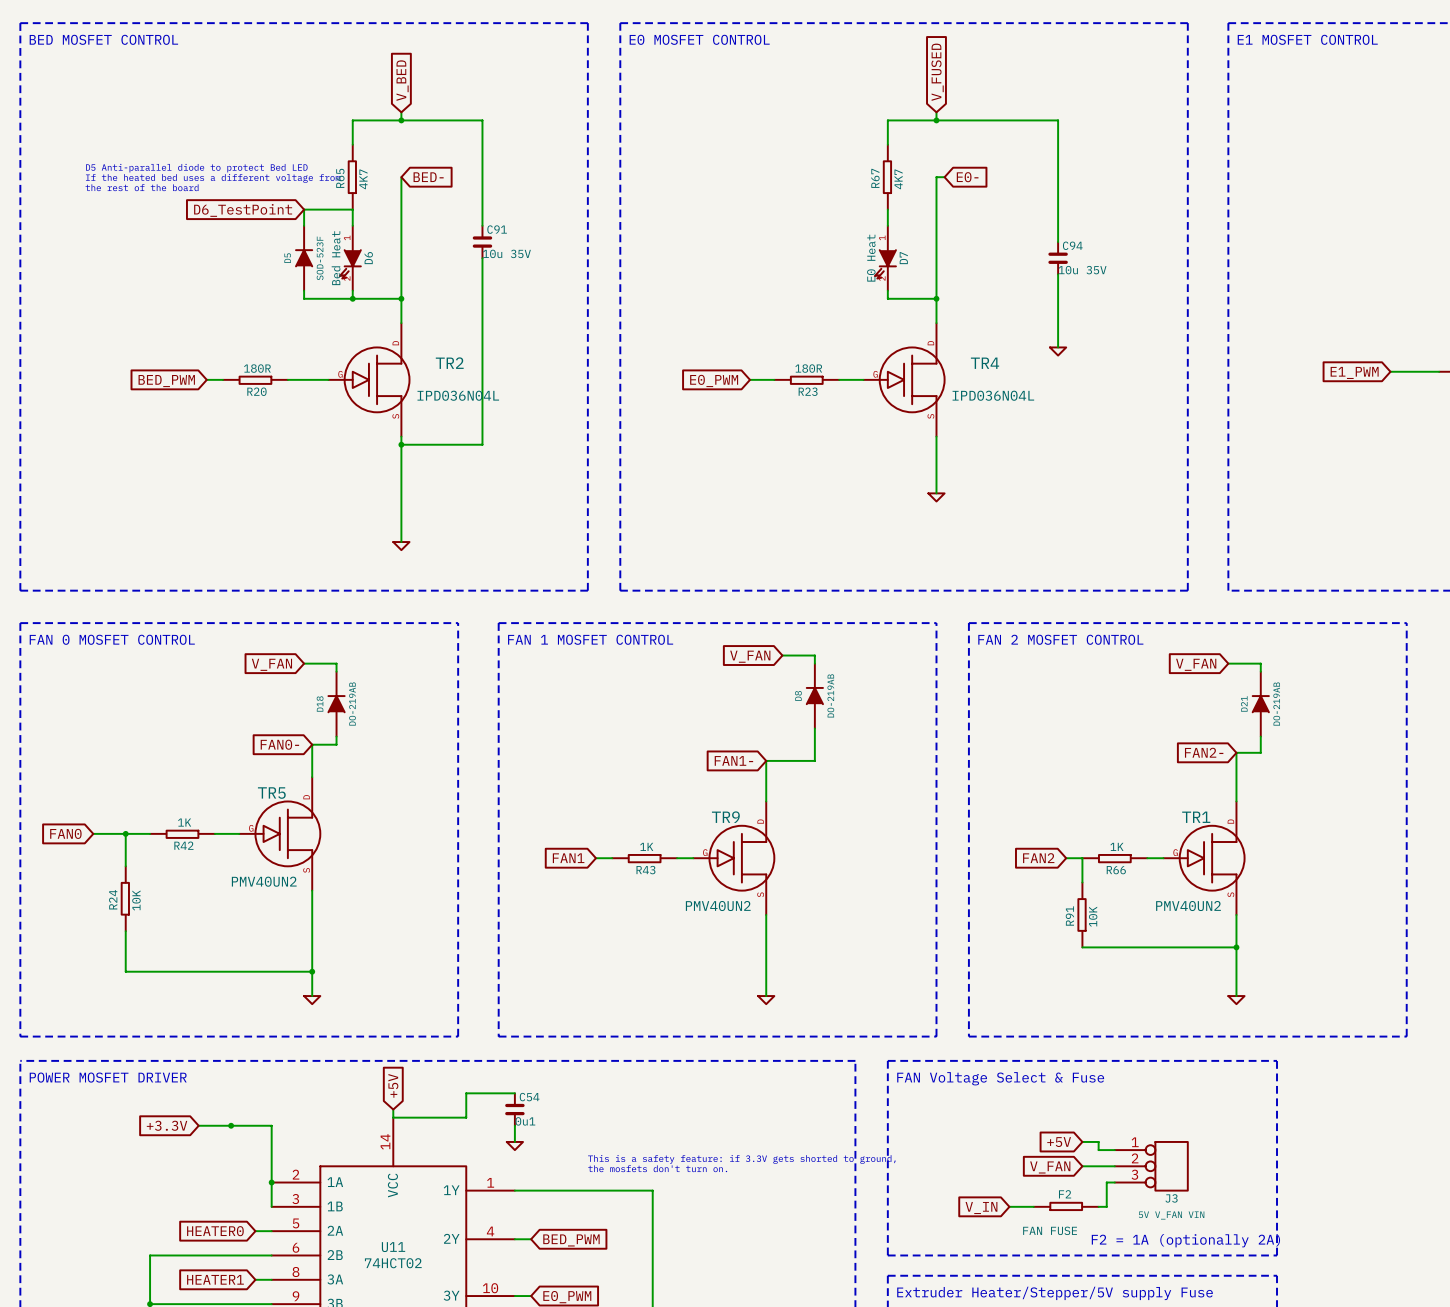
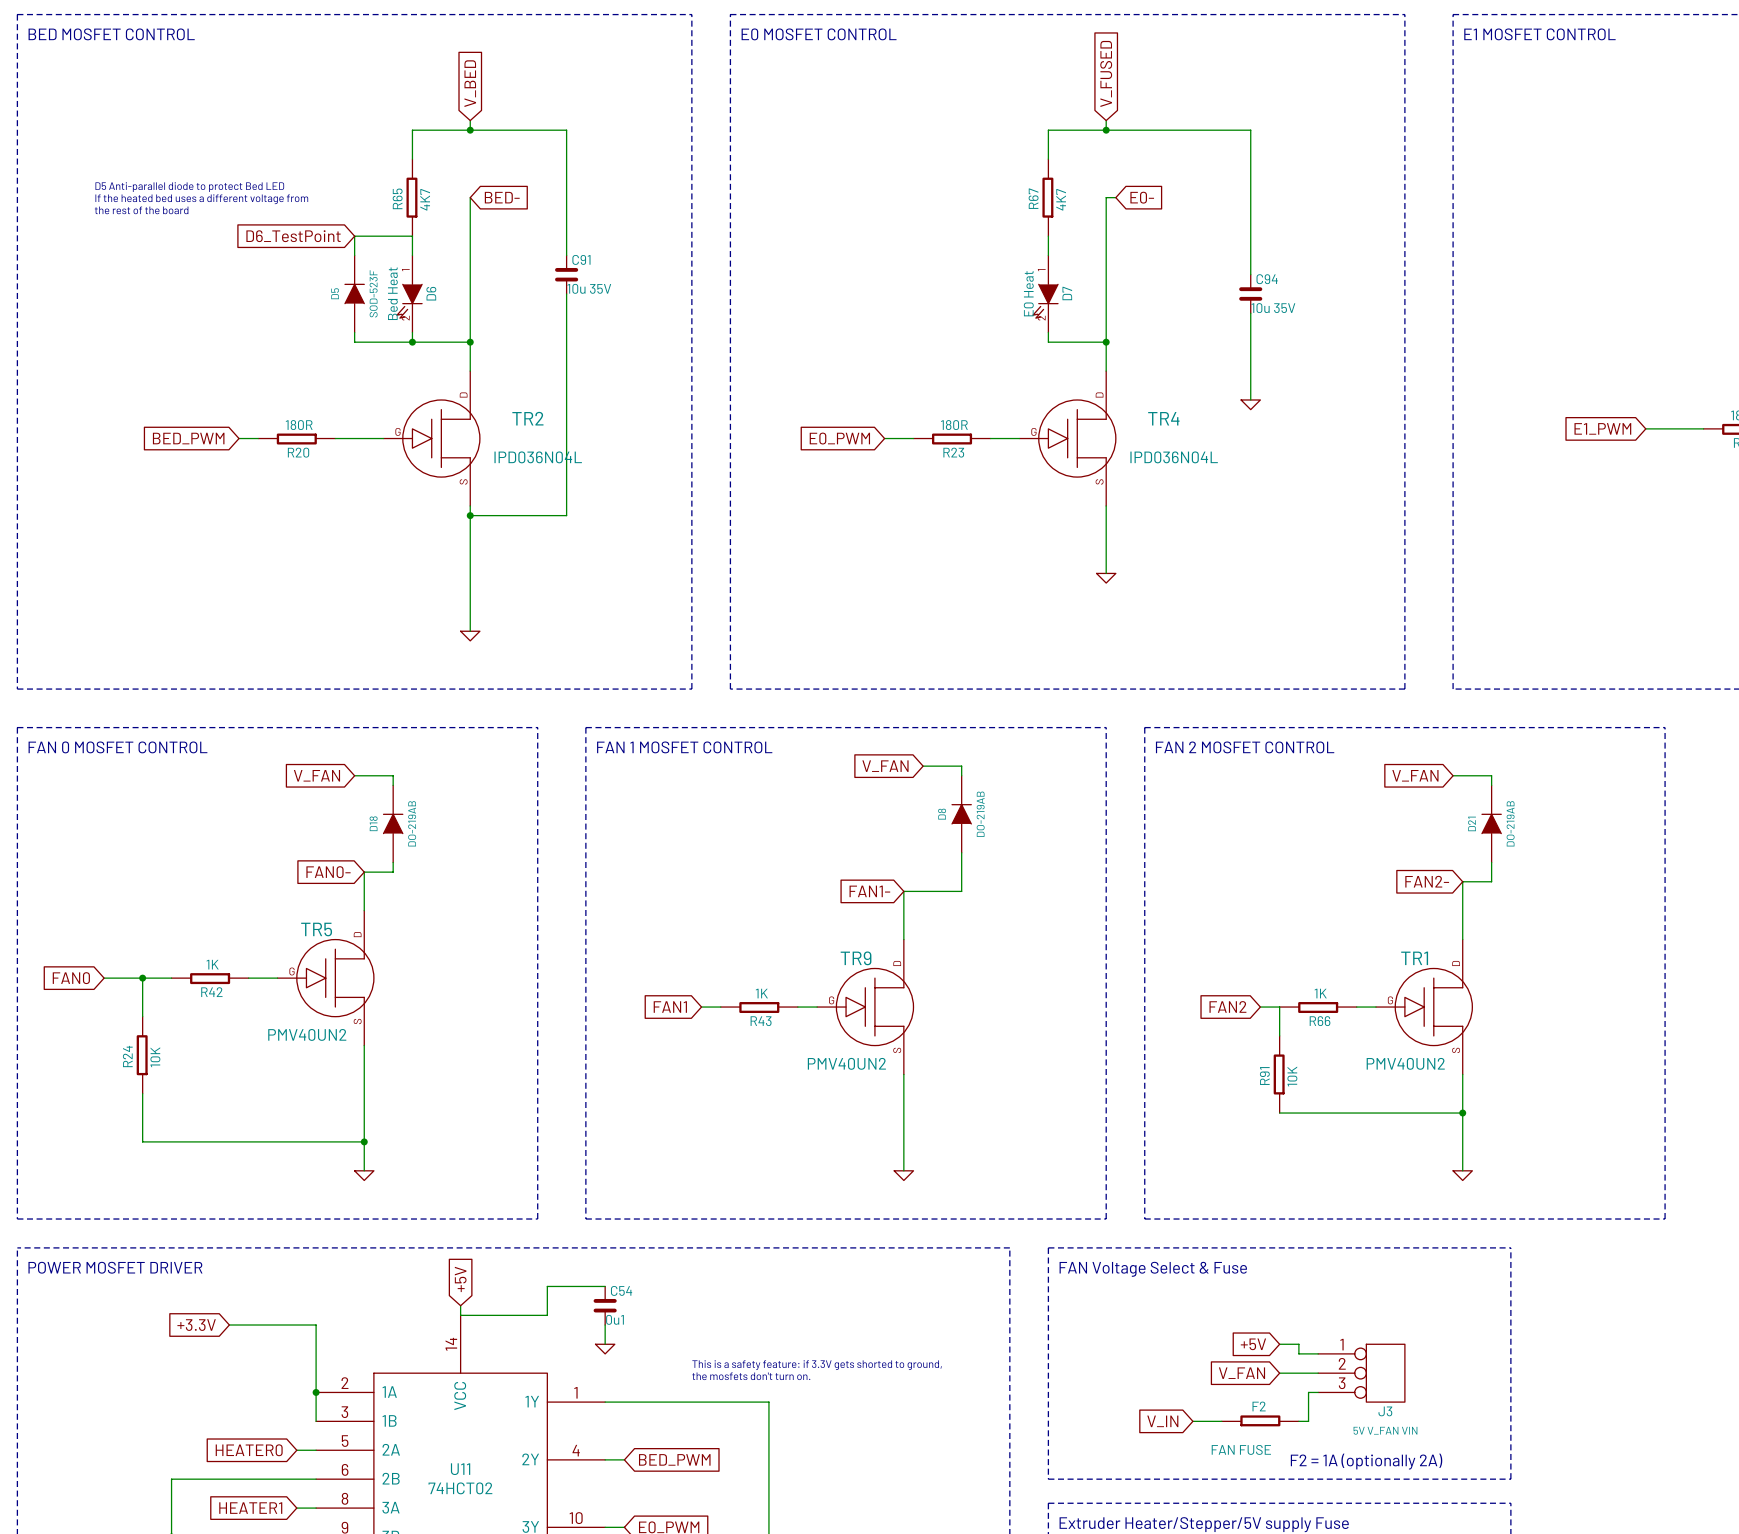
junction: (231, 1125) -> none

